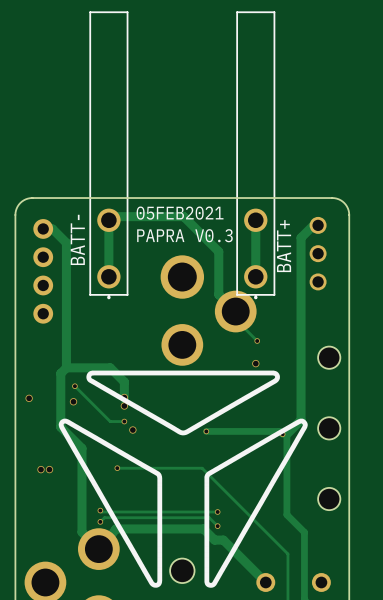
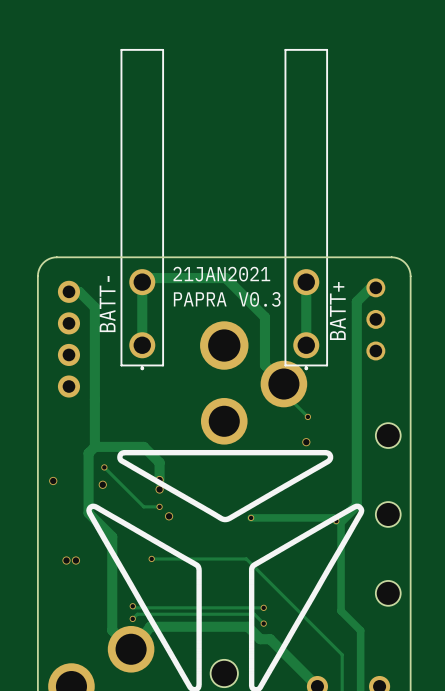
text: 05FEB2021 (180, 213) -> 21JAN2021 (221, 274)

